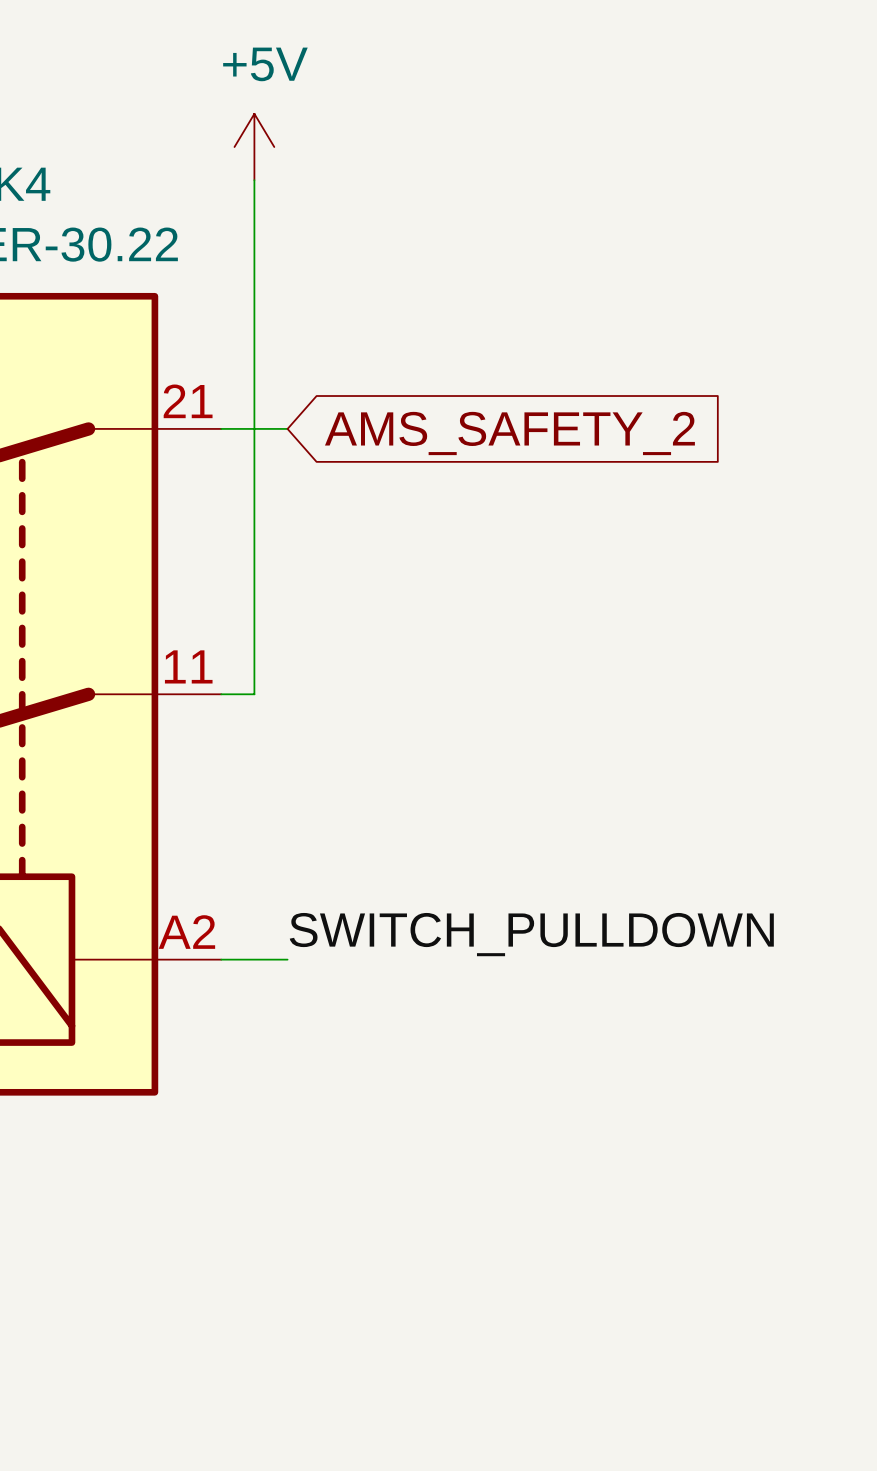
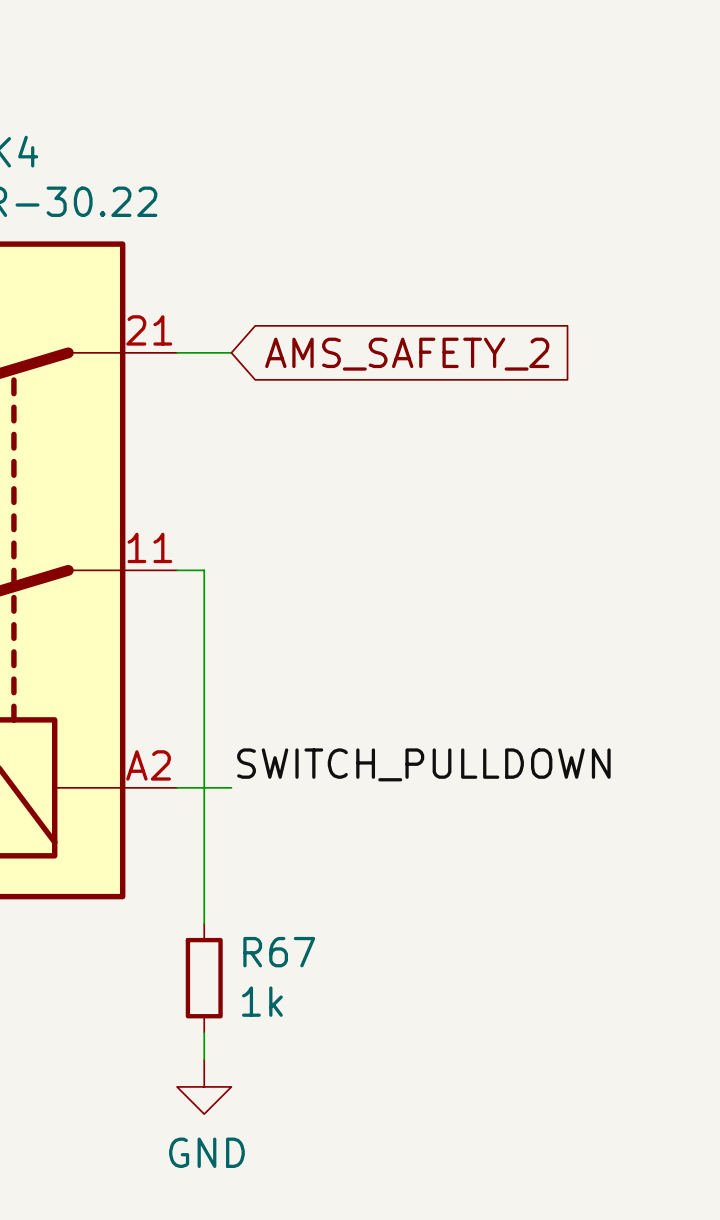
power symbol: +5V (254, 147) -> none
wire: (254, 180) (254, 694) -> (204, 923) (204, 570)
R67: none -> 1k (204, 978)
wire: none -> (204, 1032) (204, 1059)
power symbol: none -> GND (204, 1086)

